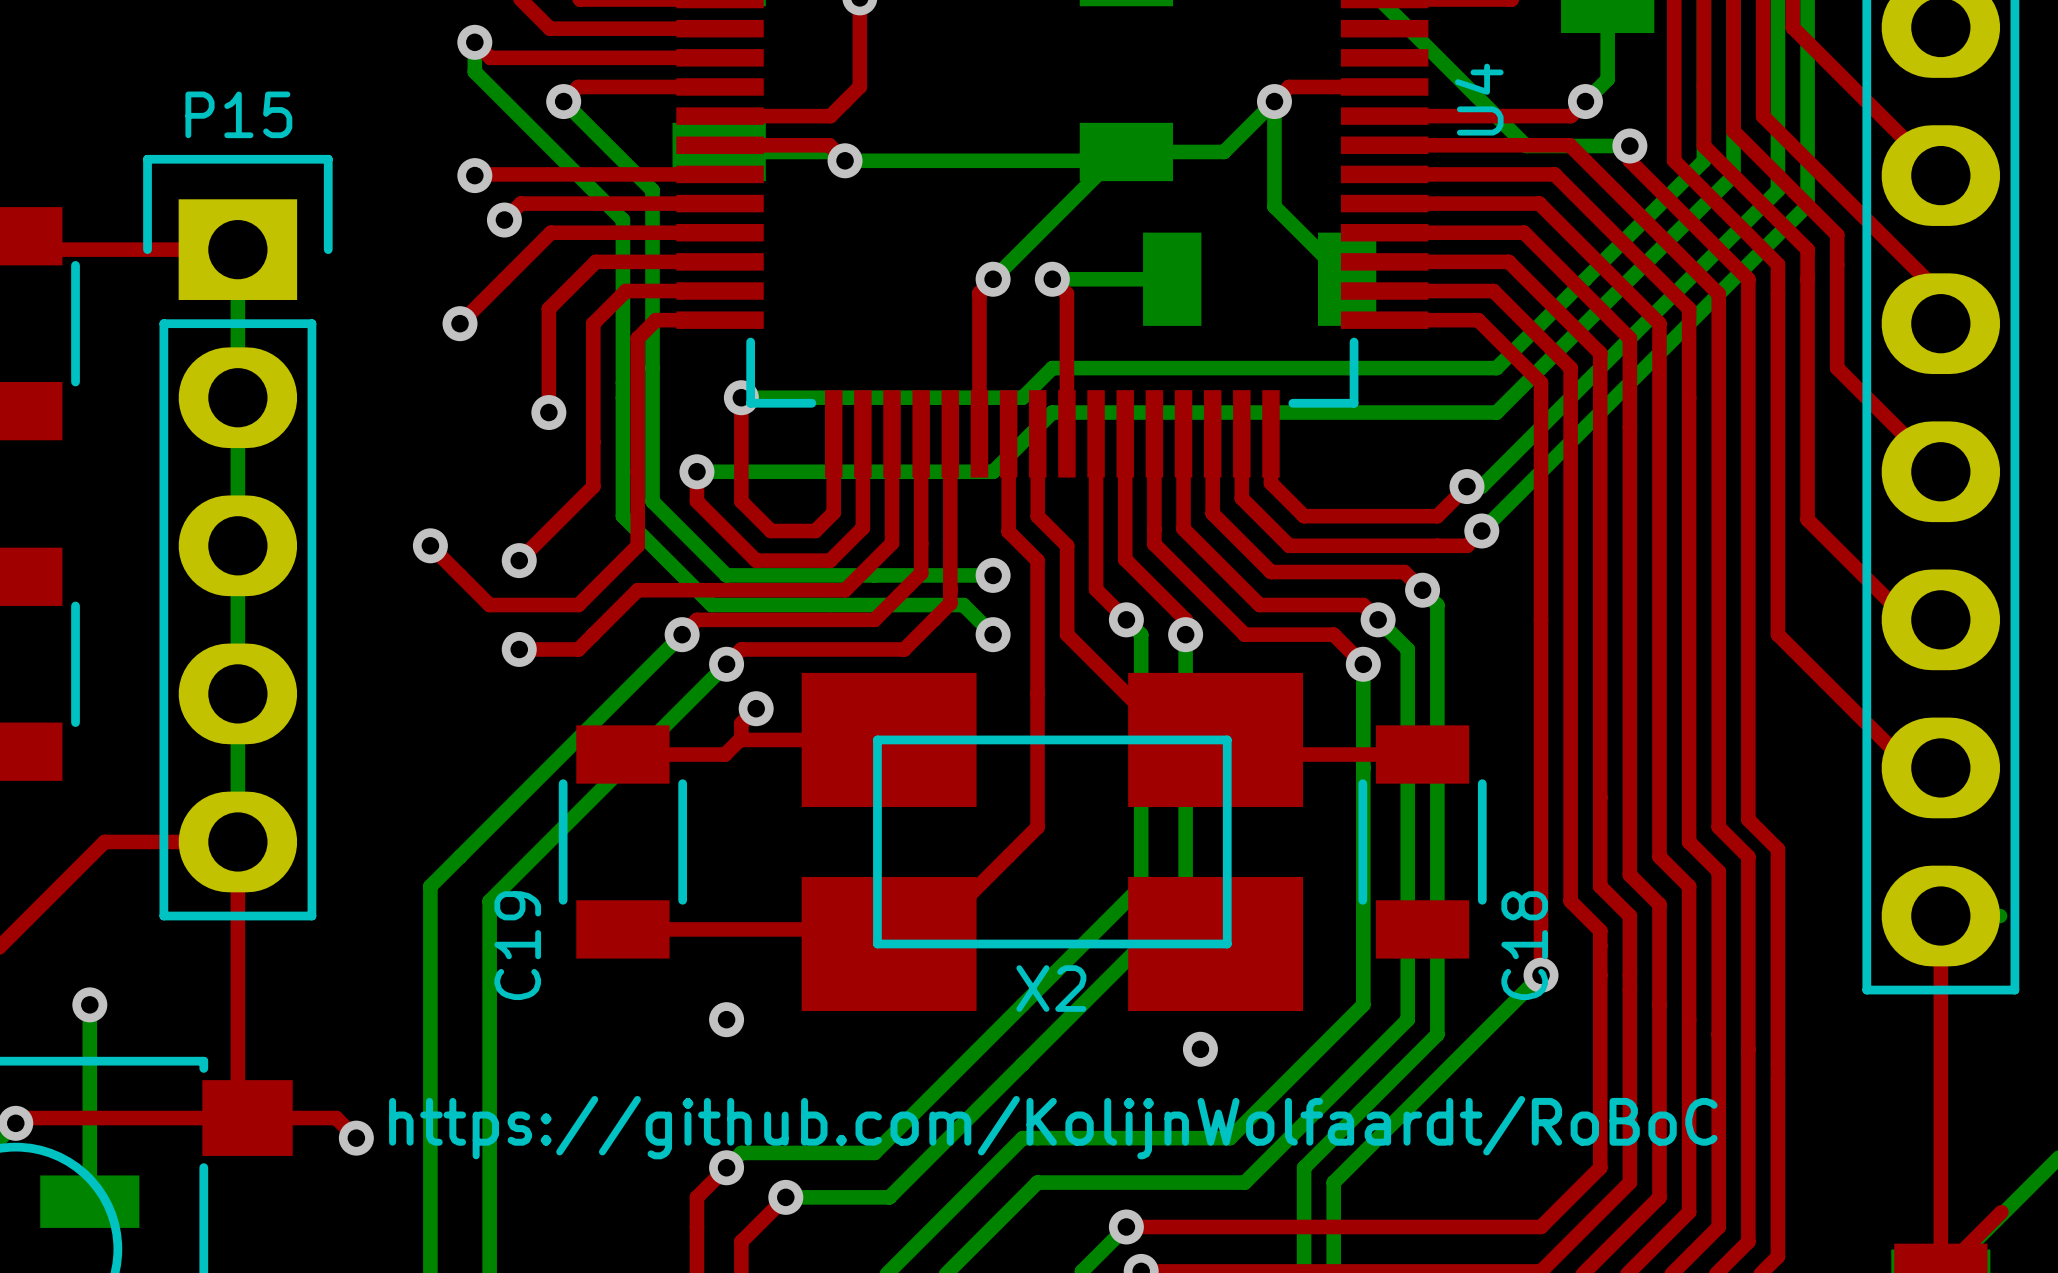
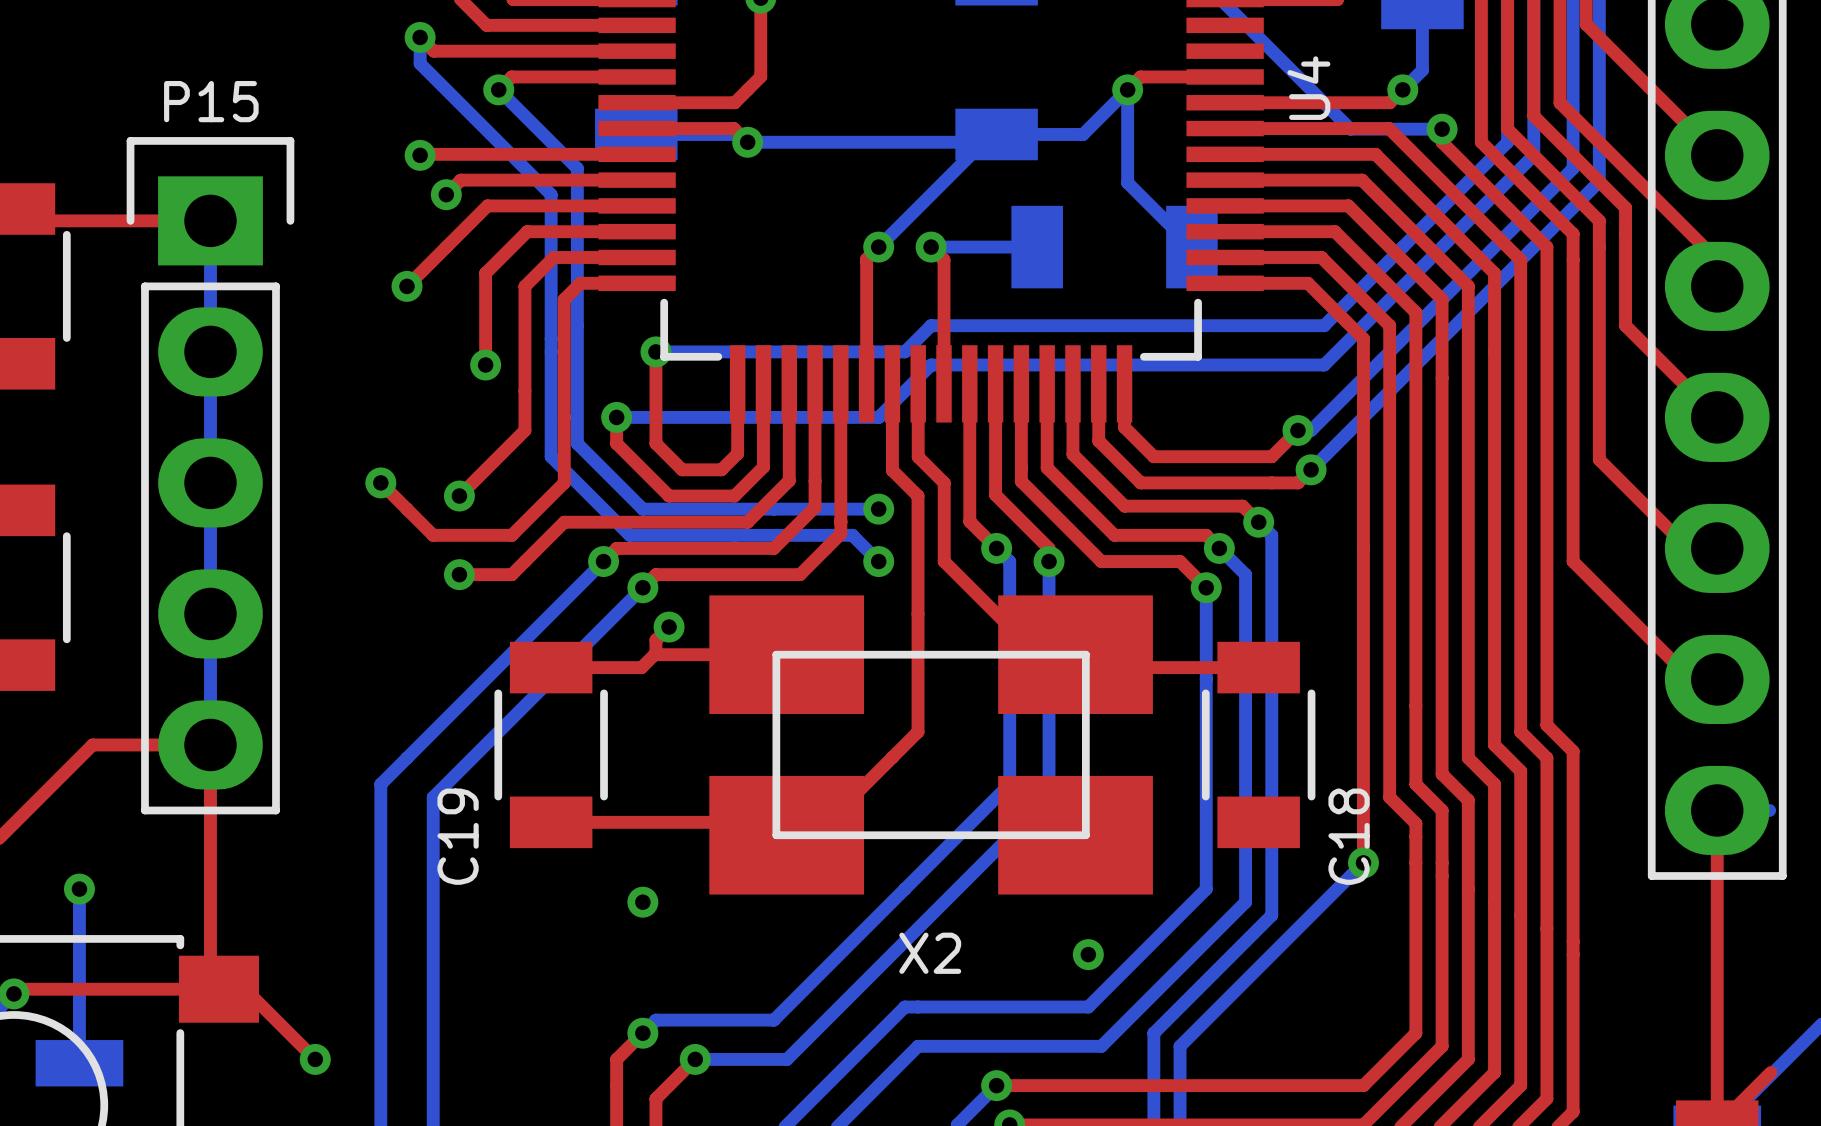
X2 name position: X2 (1051, 988) -> X2 (930, 953)
via position: (1200, 1049) -> (1088, 954)
top track: (277, 1118) (336, 1118) (356, 1138) -> (245, 989) (315, 1059)
text: https://github.com/KolijnWolfaardt/RoBoC (1053, 1127) -> none
via position: (356, 1138) -> (315, 1059)

